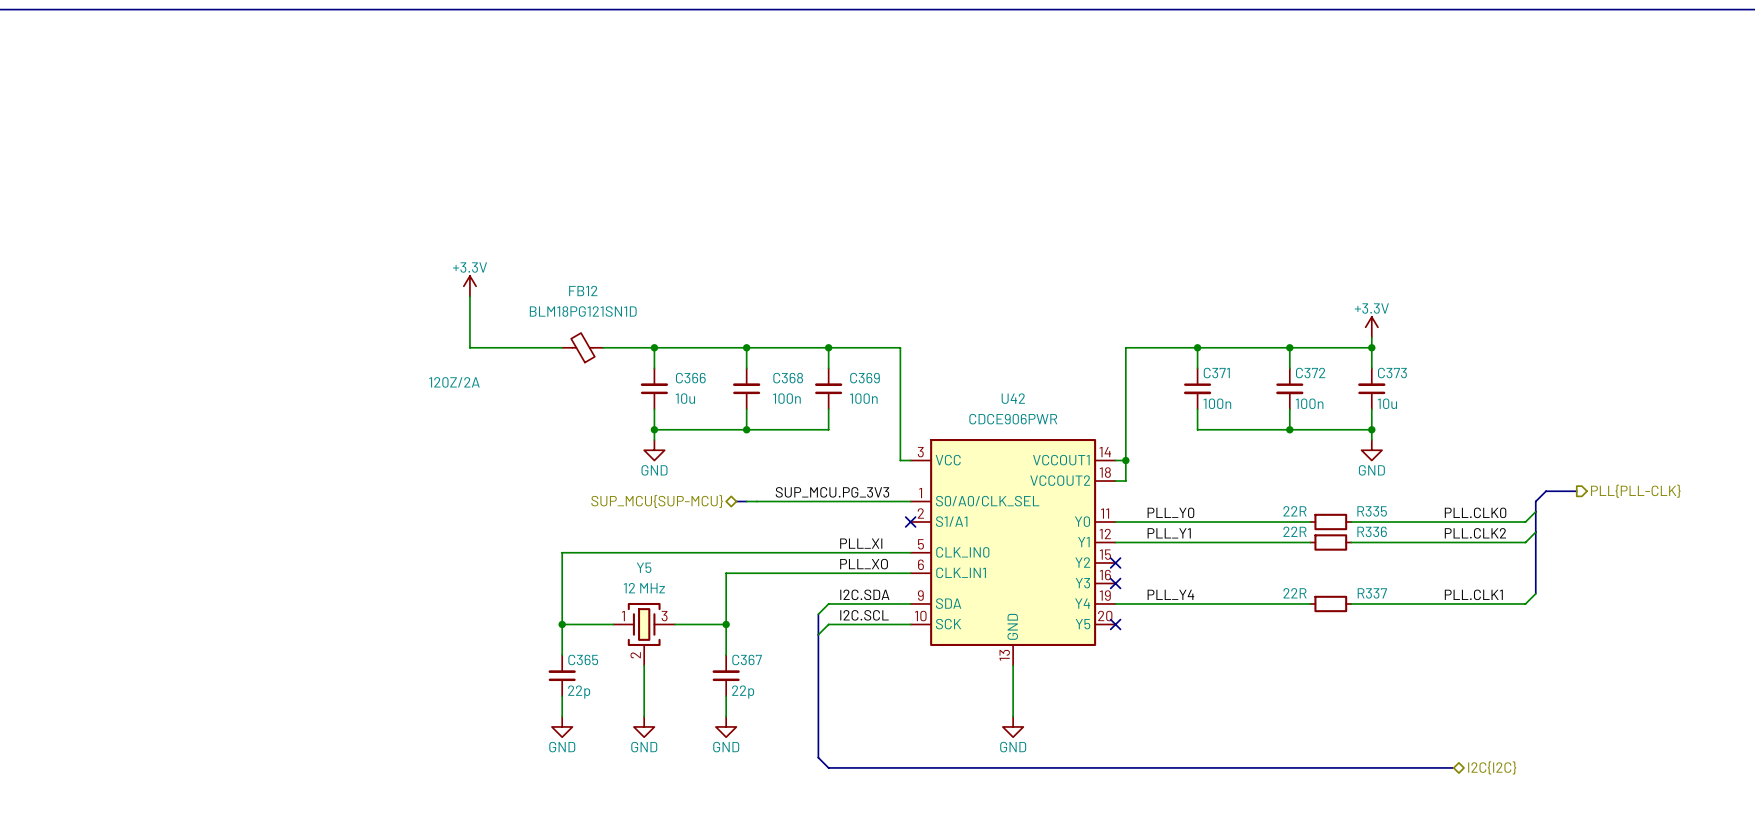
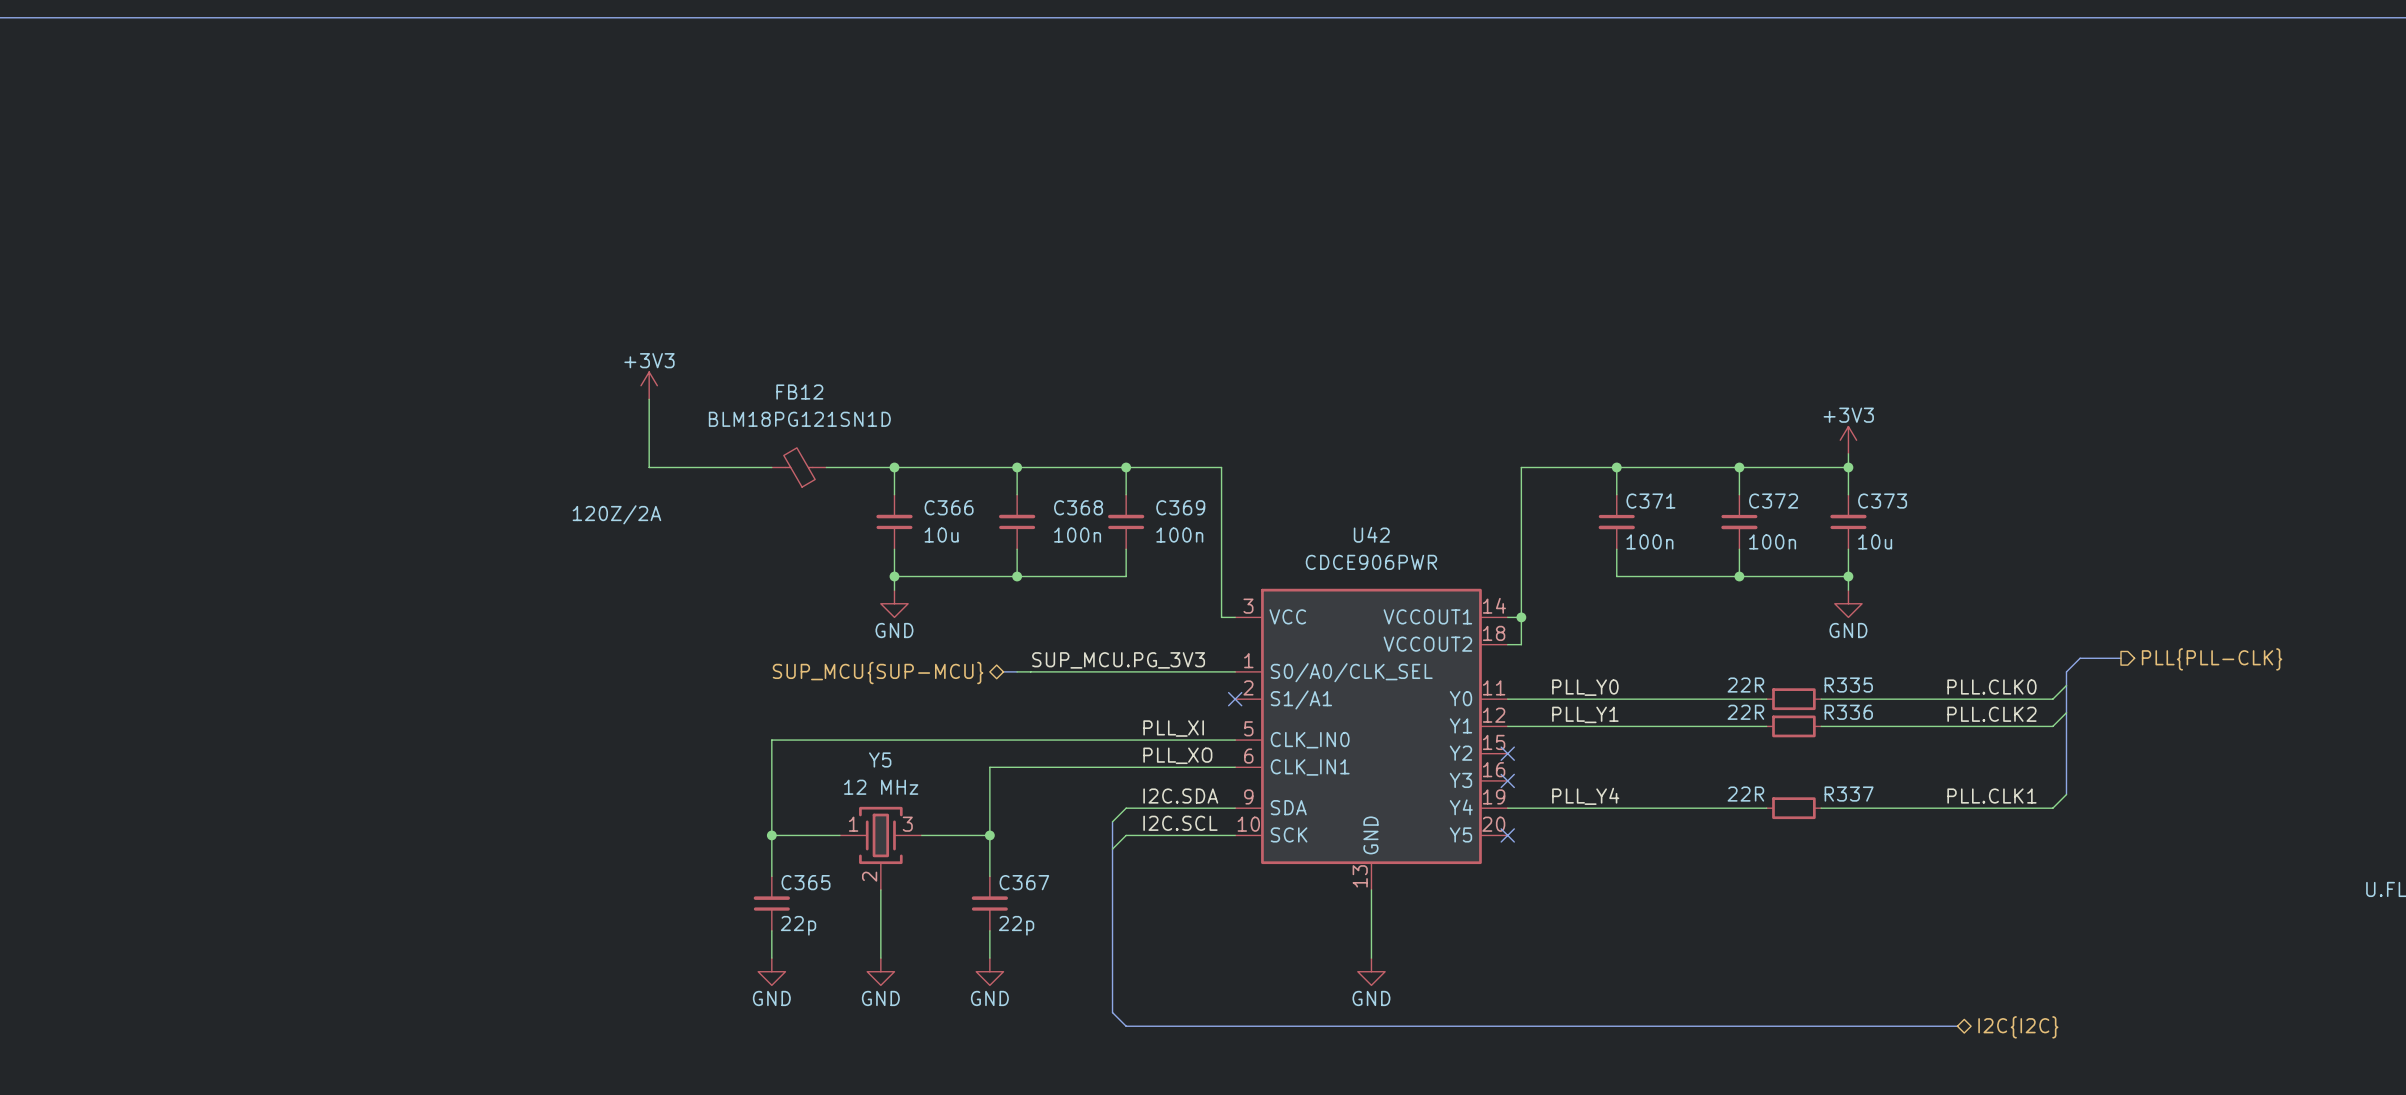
power symbol: +3.3V (469, 286) -> +3V3 (649, 385)
power symbol: +3.3V (1371, 327) -> +3V3 (1848, 440)

